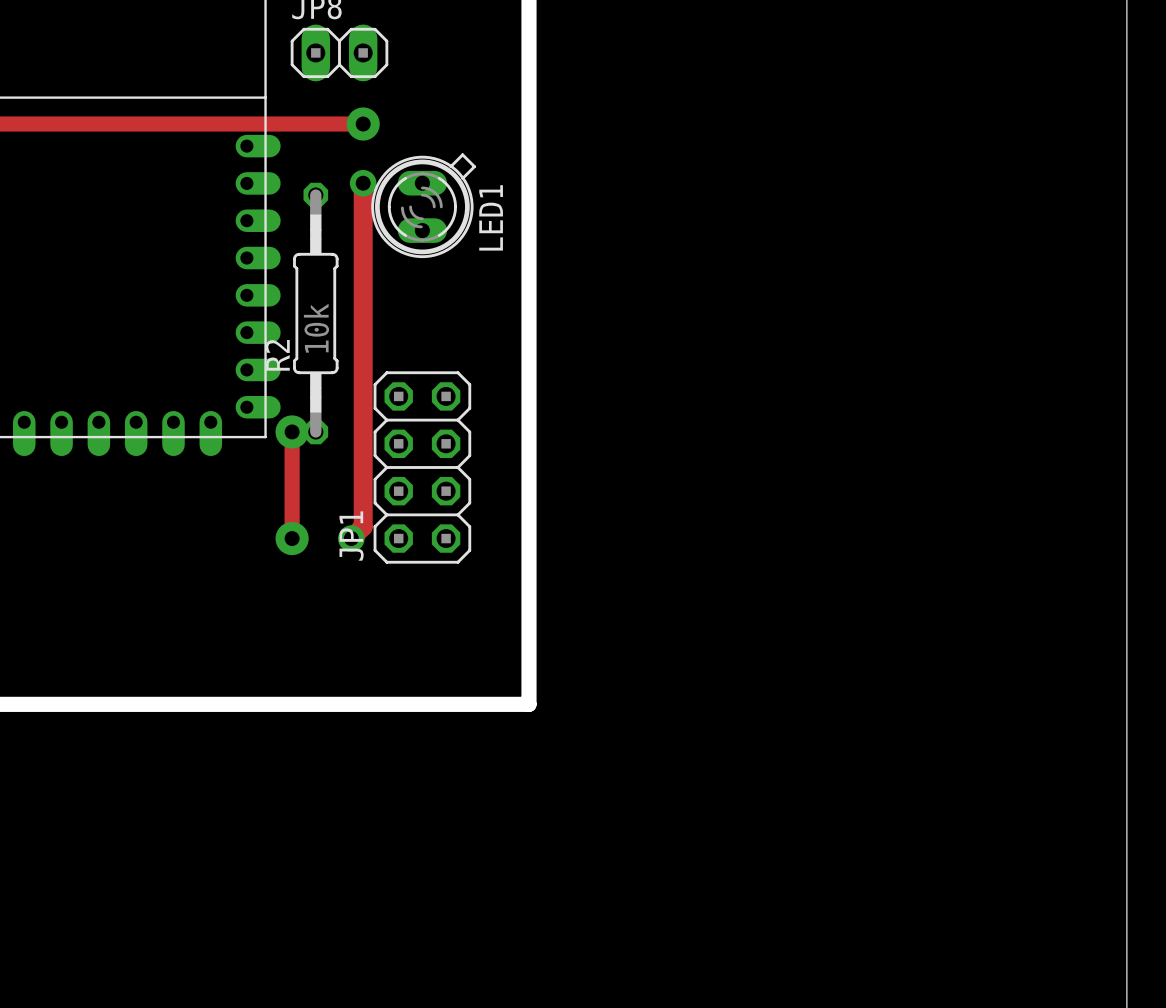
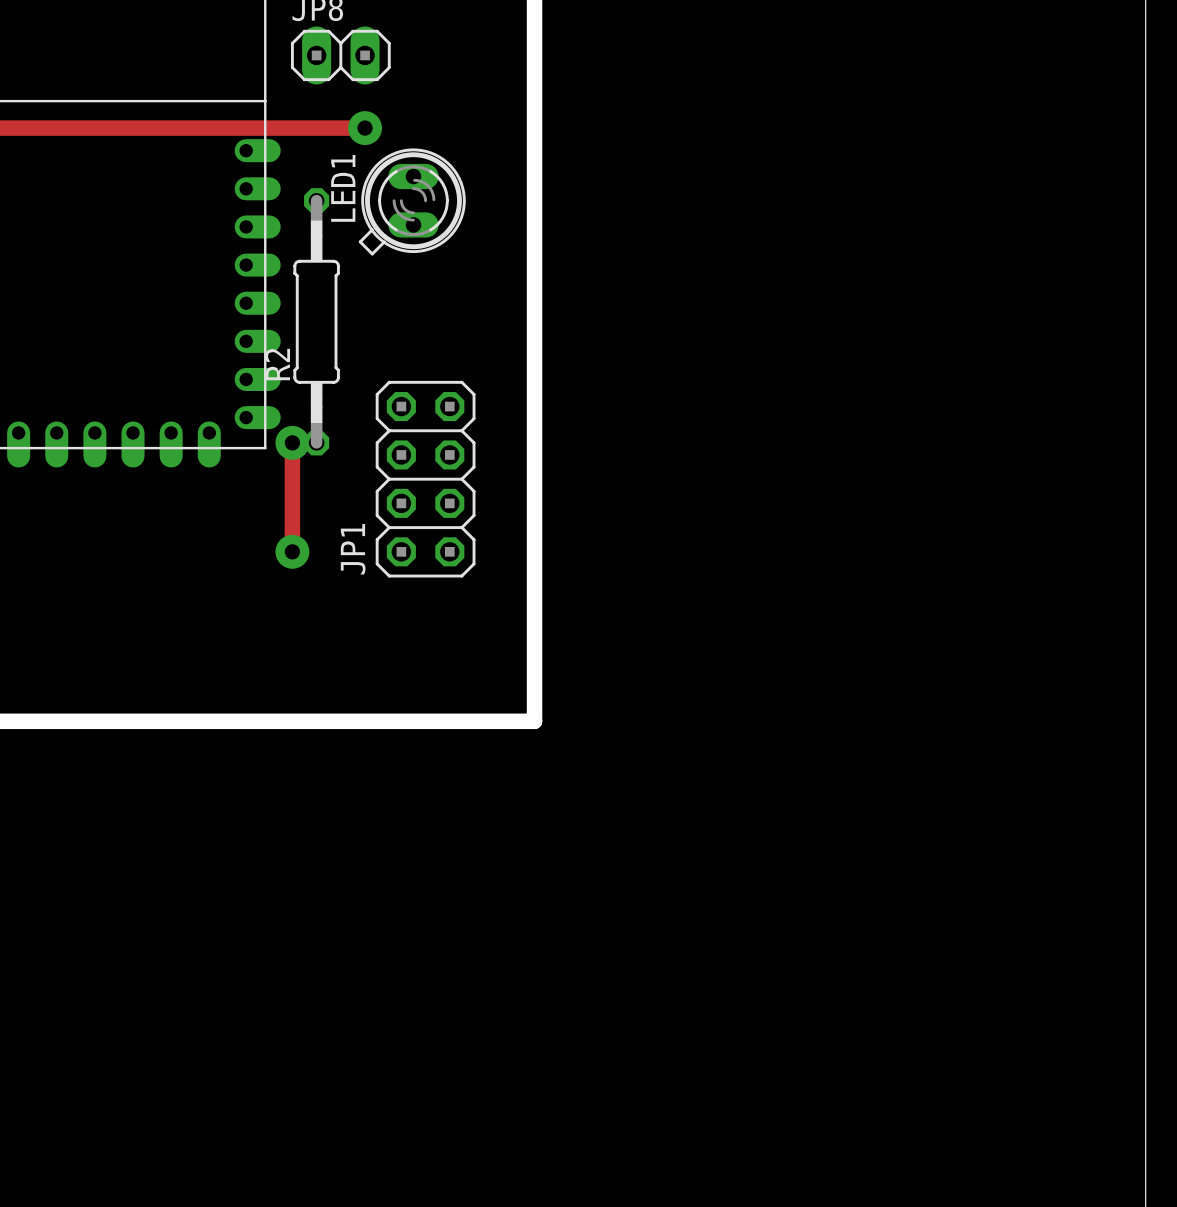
track: (363, 183) (363, 526) (351, 538) -> none
via: (363, 183) -> none
LED1 rotation: 0° (423, 205) -> 180° (412, 201)
R2 value: 10k (316, 328) -> none
via: (351, 538) -> none

